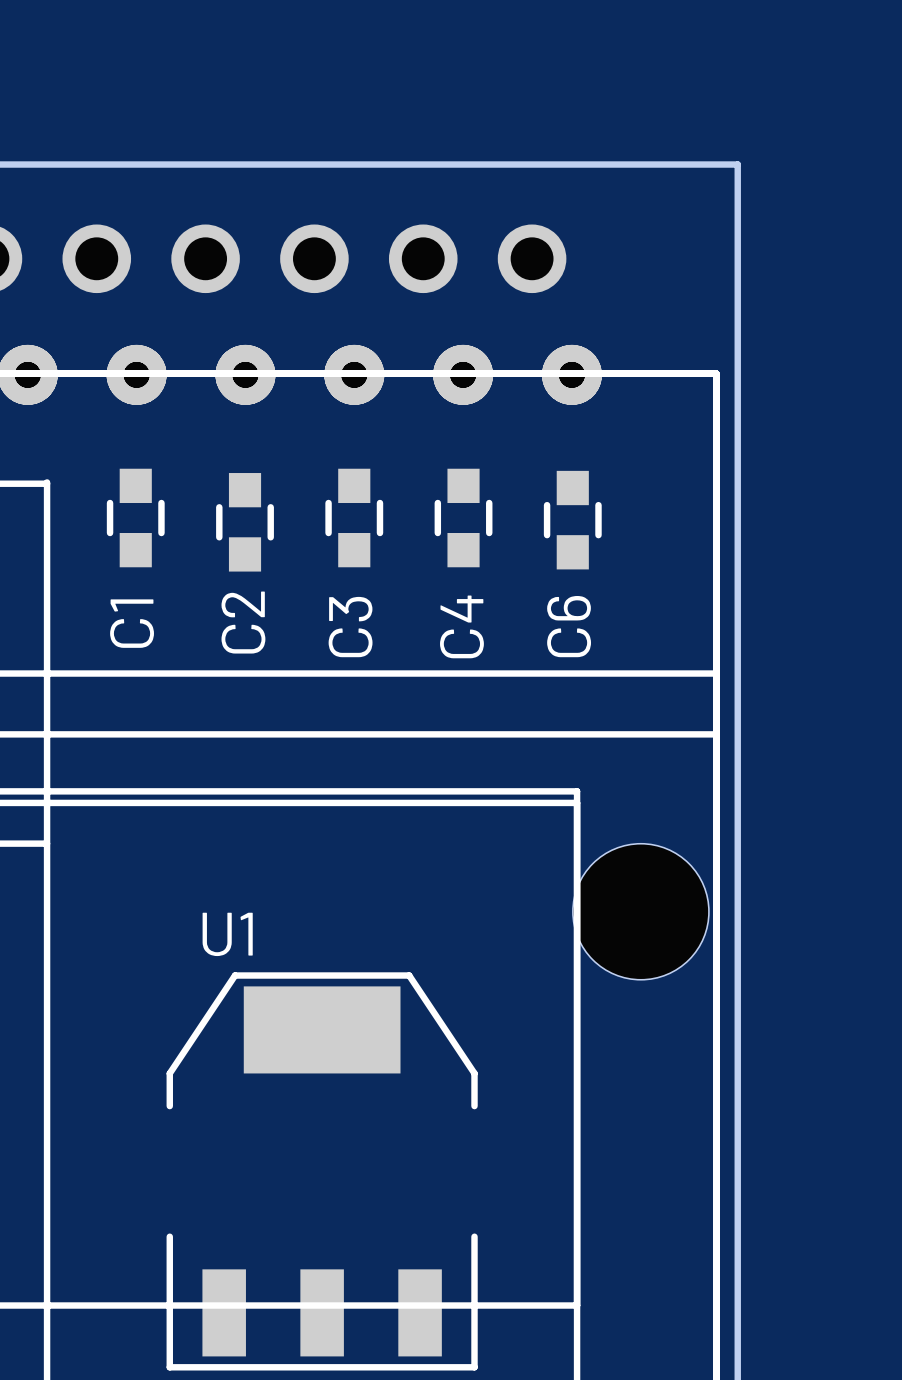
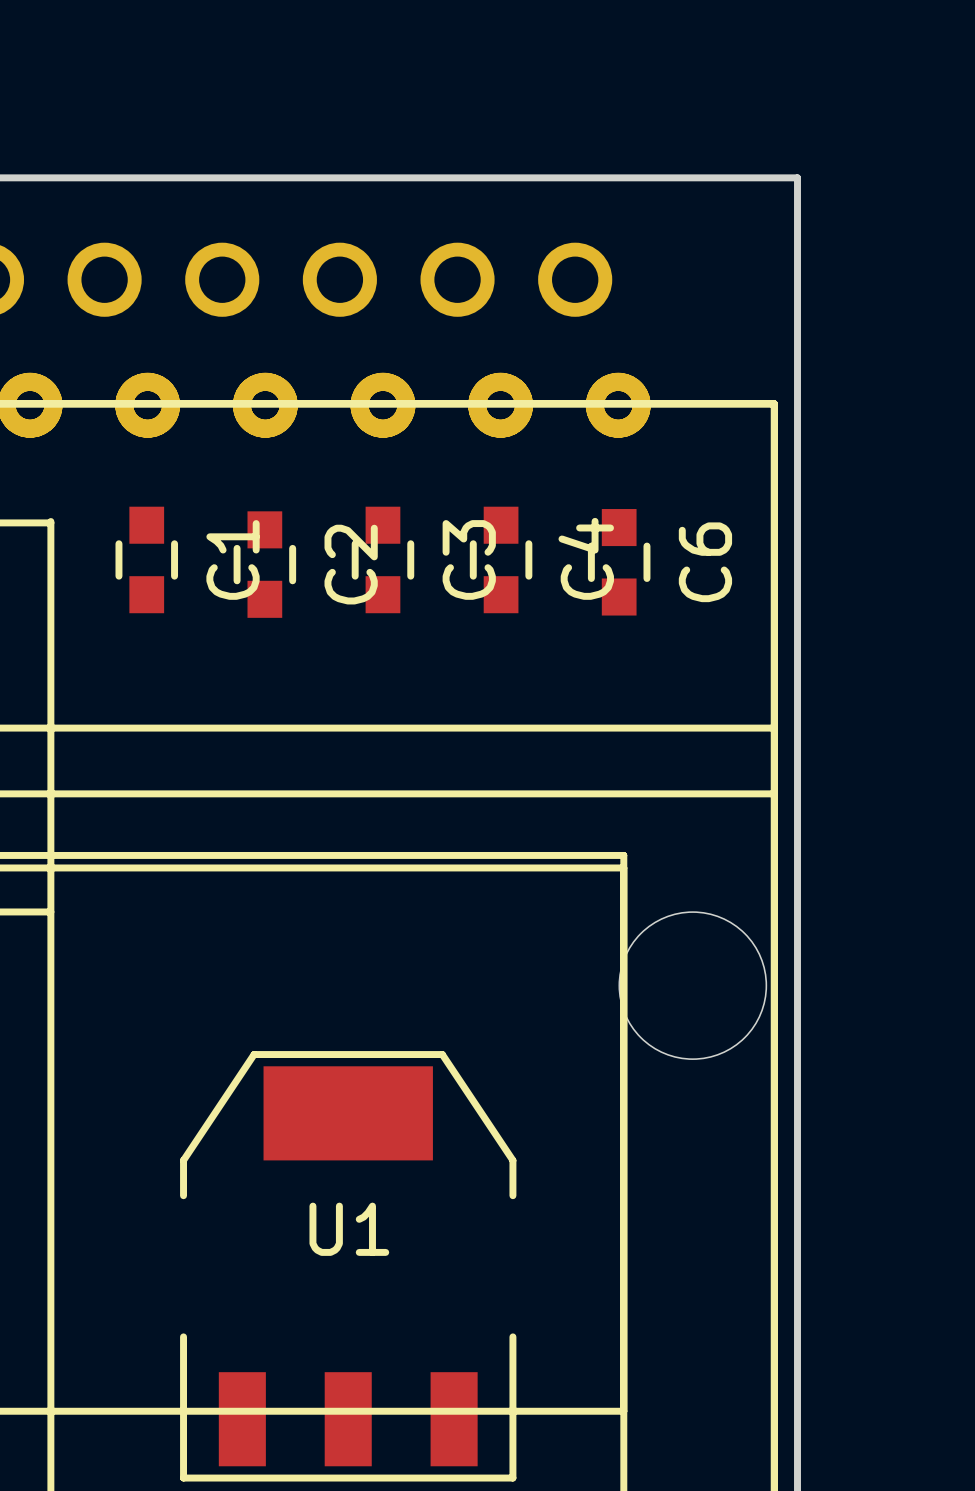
C2 name position: C2 (243, 622) -> C2 (351, 564)
C1 name position: C1 (132, 623) -> C1 (233, 559)
C4 name position: C4 (461, 626) -> C4 (586, 558)
C6 name position: C6 (569, 626) -> C6 (705, 562)
C3 name position: C3 (350, 627) -> C3 (469, 559)
U1 name position: U1 (227, 934) -> U1 (349, 1229)

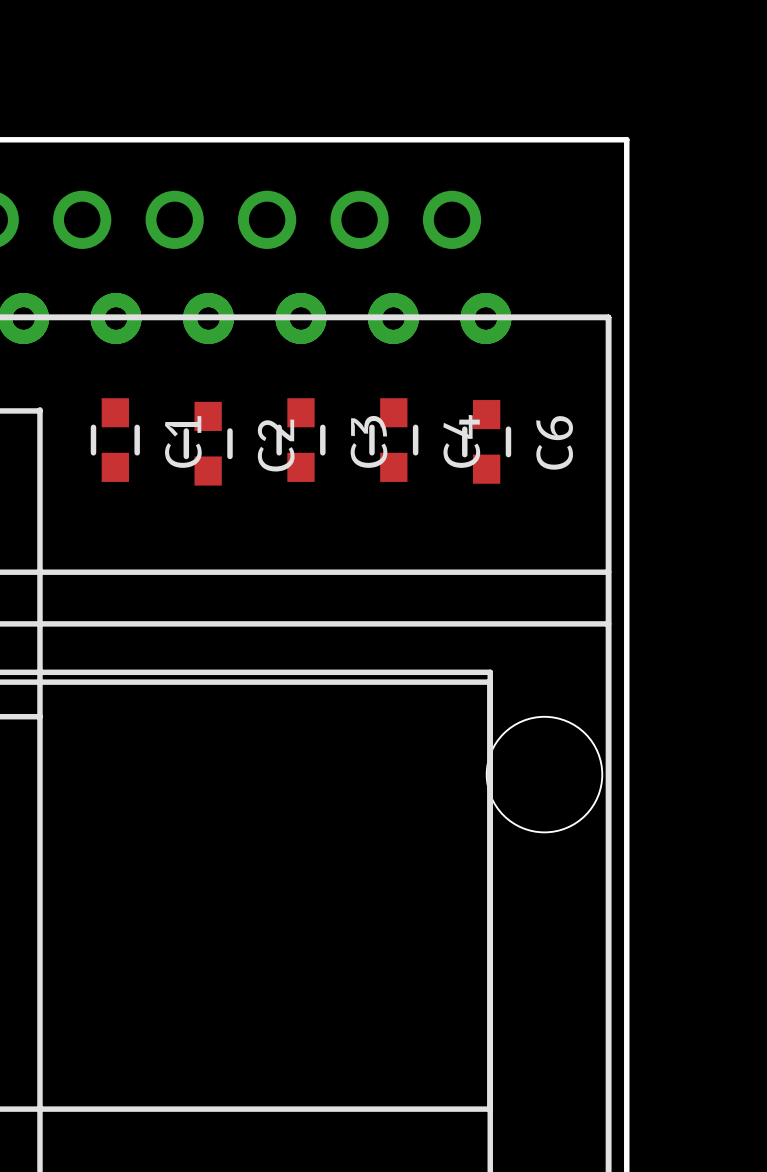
U1: (348, 1266) -> none

